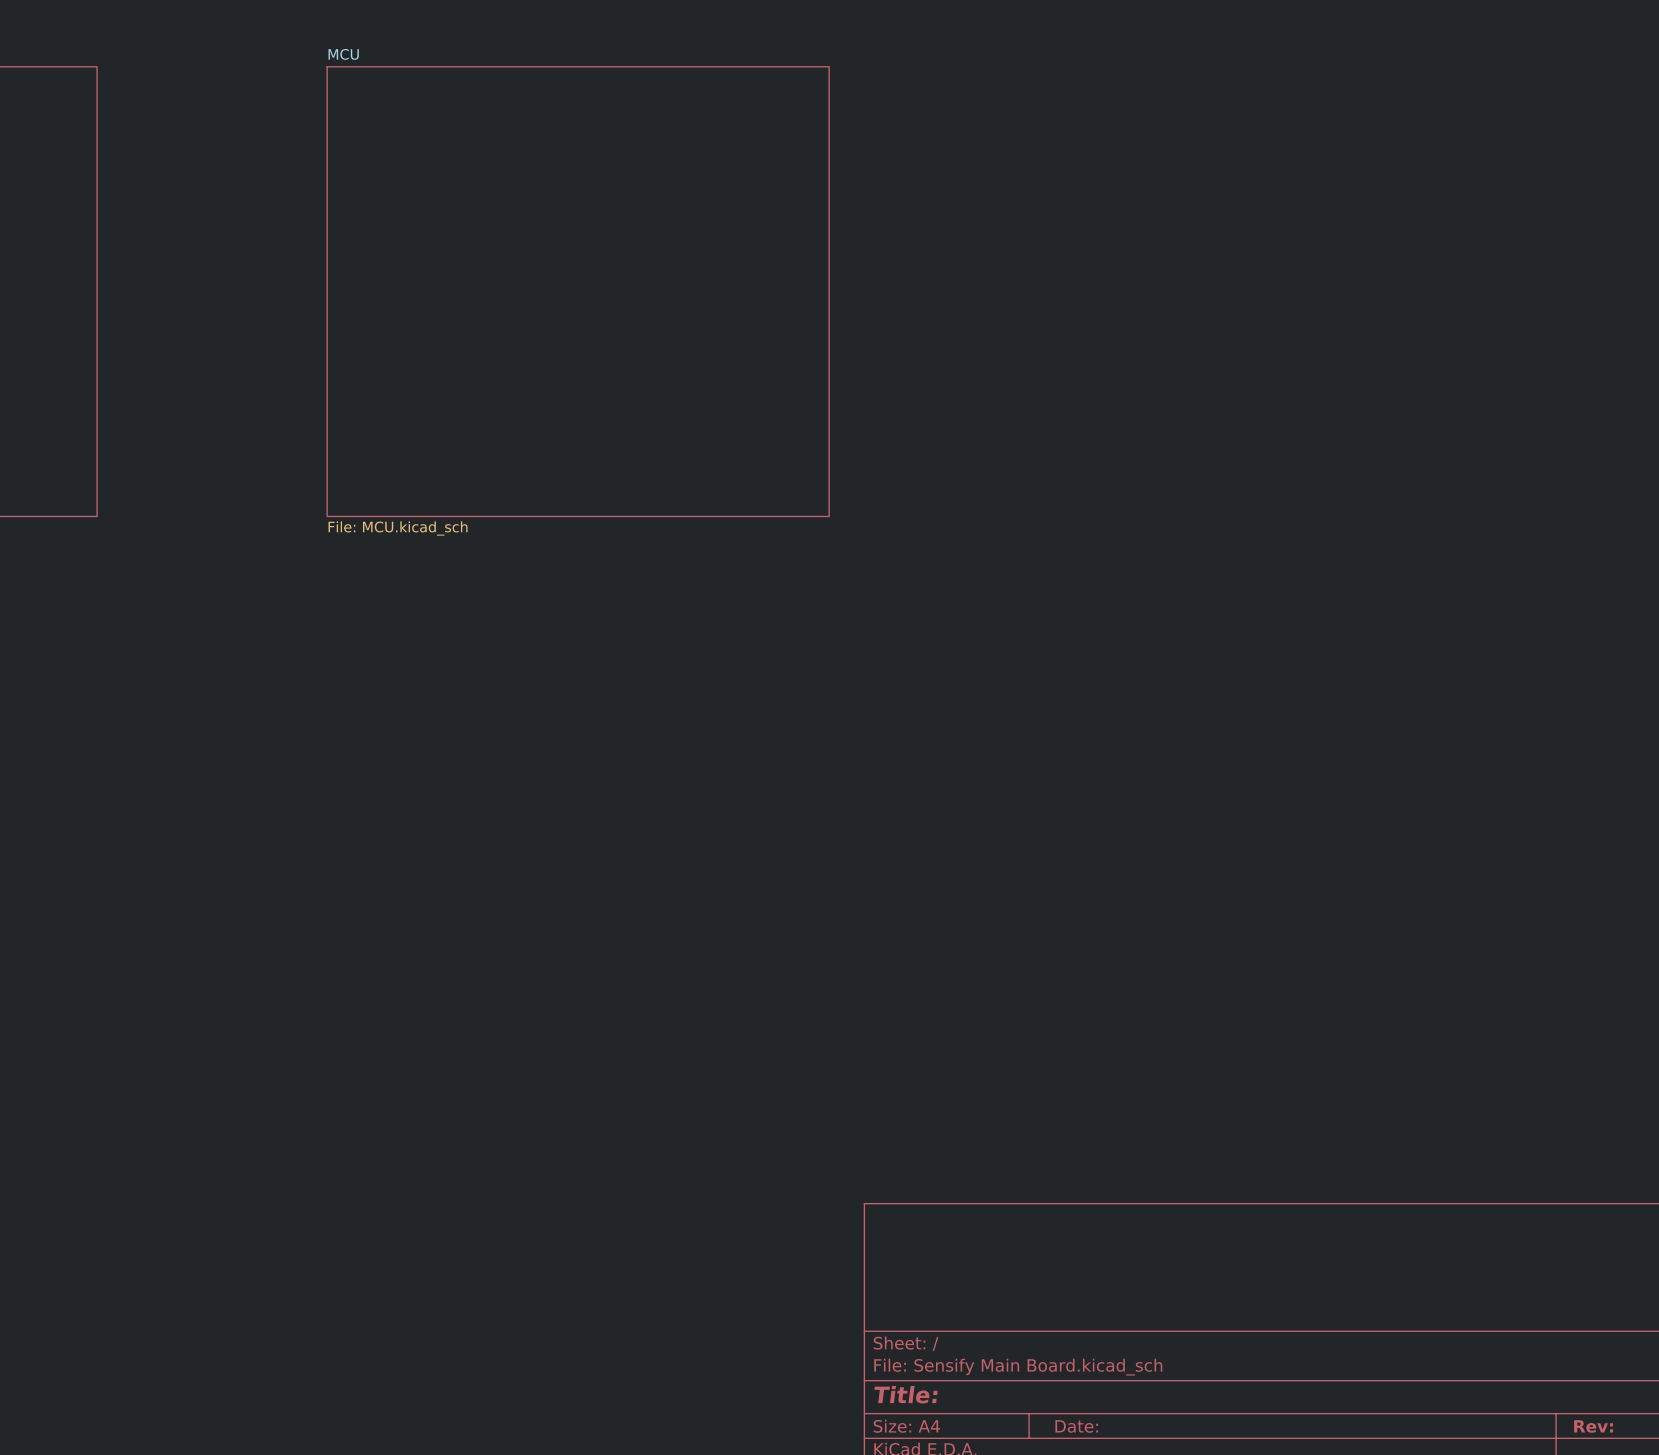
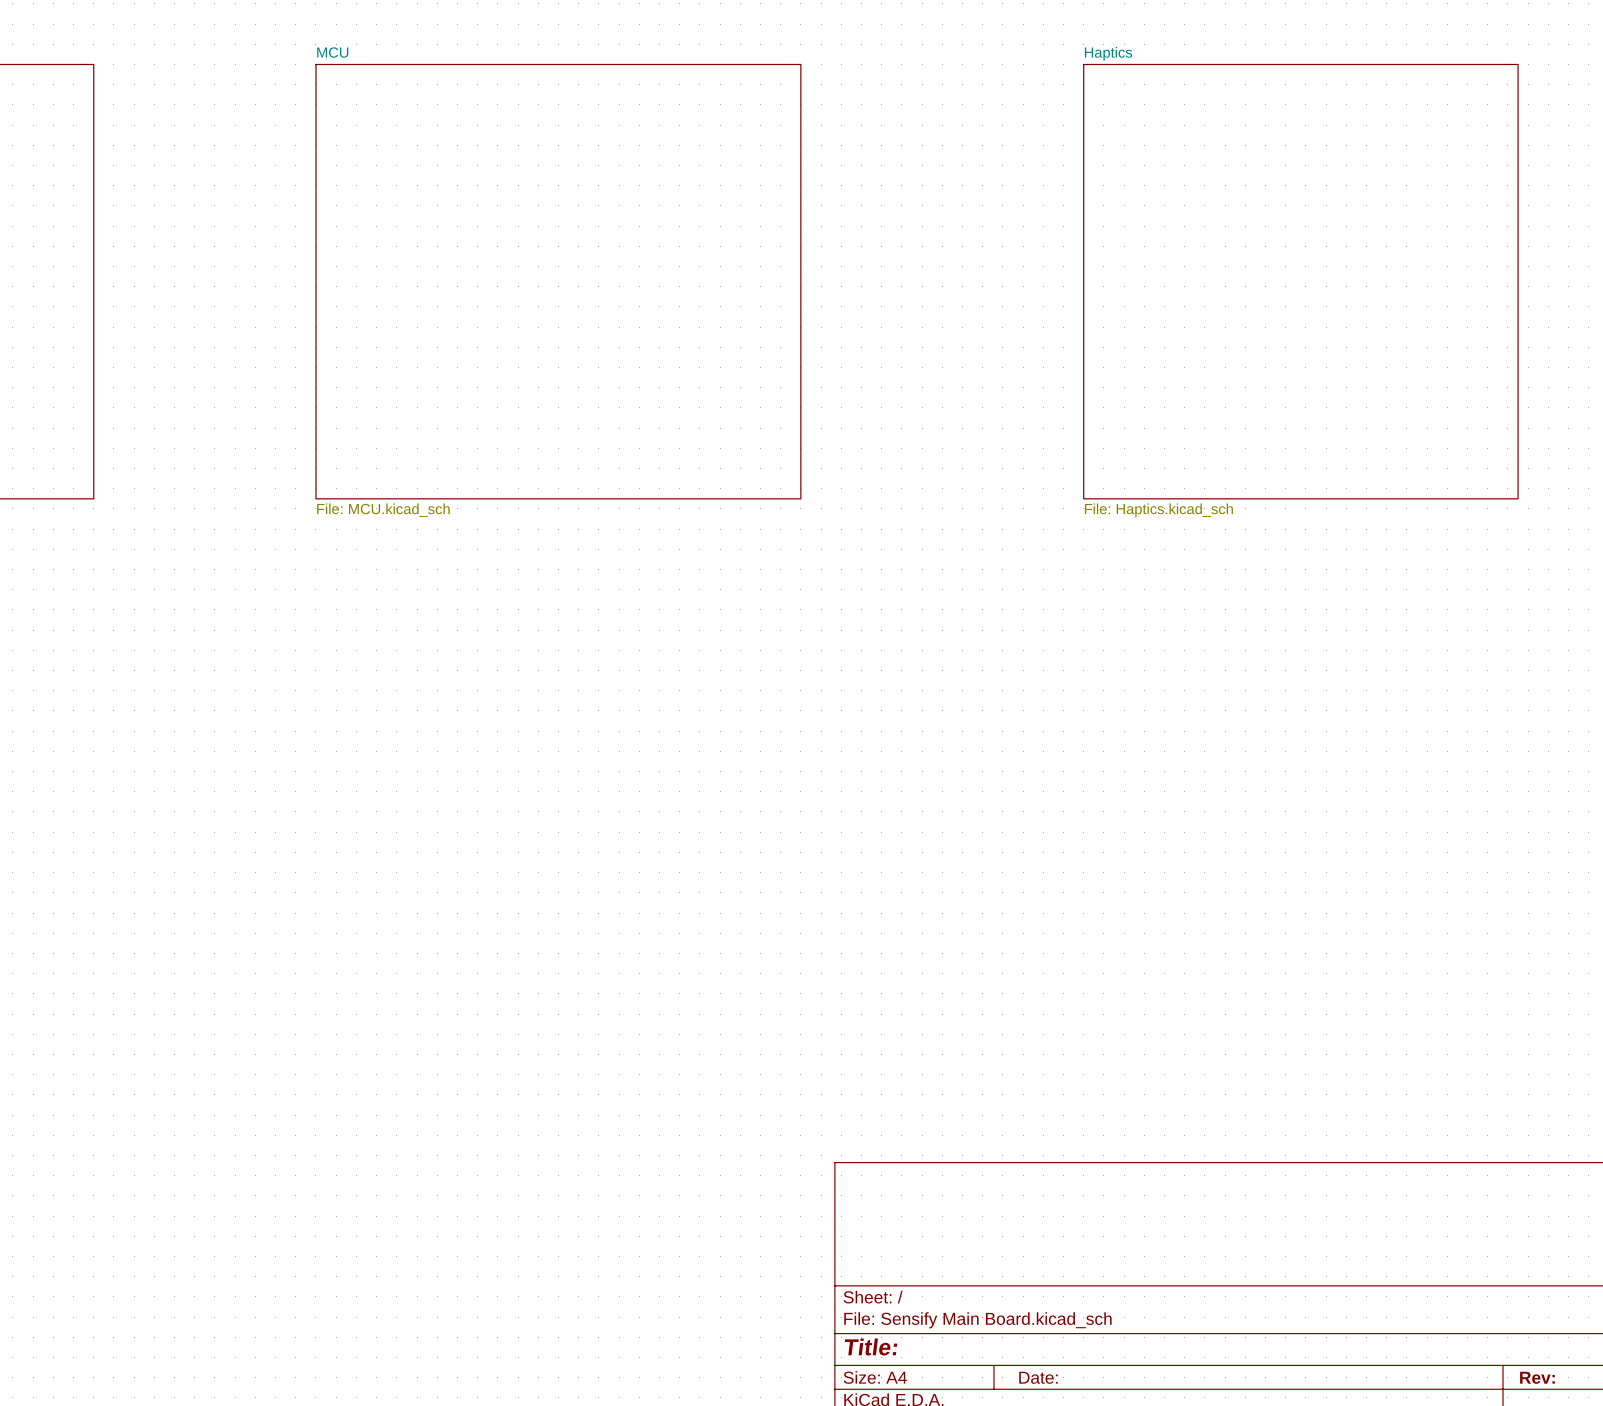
sheet Haptics: none -> File: Haptics.kicad_sch (1300, 281)

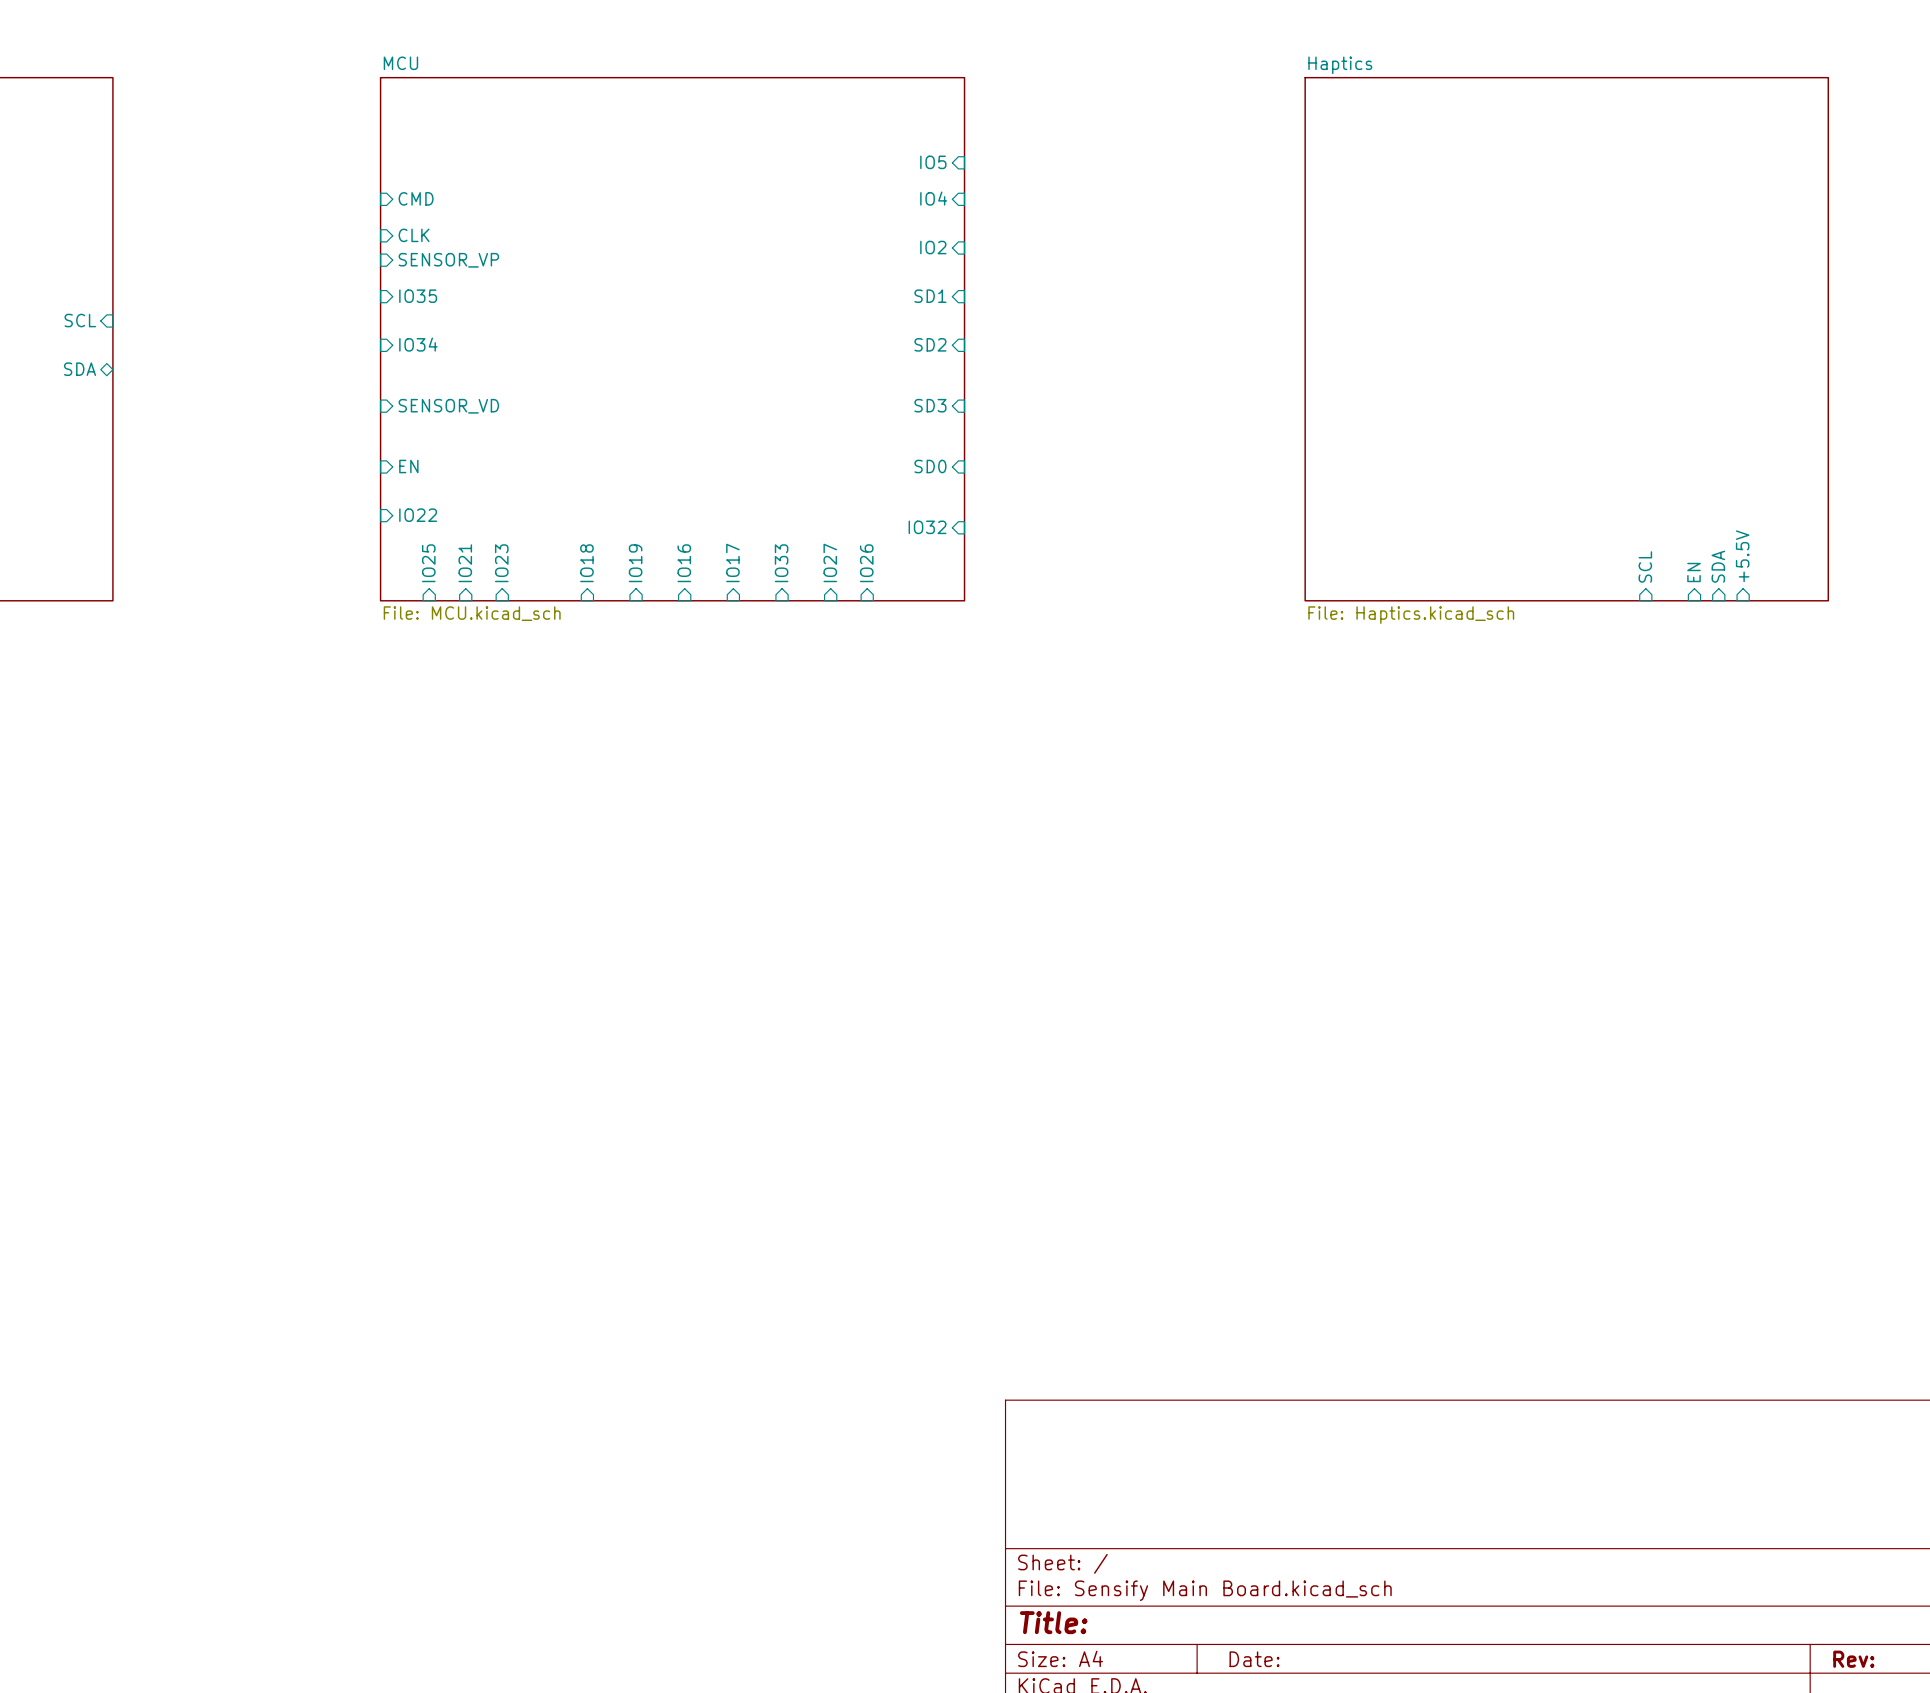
sheet pin: none -> IO5 (933, 162)
sheet pin: none -> CMD (416, 198)
sheet pin: none -> IO4 (933, 198)
sheet pin: none -> CLK (414, 235)
sheet pin: none -> IO2 (933, 247)
sheet pin: none -> SENSOR_VP (448, 260)
sheet pin: none -> IO35 (418, 296)
sheet pin: none -> SD1 (930, 296)
sheet pin: none -> SCL (80, 320)
sheet pin: none -> IO34 (418, 344)
sheet pin: none -> SD2 (930, 344)
sheet pin: none -> SDA (80, 369)
sheet pin: none -> SD3 (930, 405)
sheet pin: none -> SENSOR_VD (448, 406)
sheet pin: none -> EN (408, 466)
sheet pin: none -> SD0 (930, 466)
sheet pin: none -> IO22 (418, 515)
sheet pin: none -> IO32 (927, 527)
sheet pin: none -> +5.5V (1742, 556)
sheet pin: none -> IO25 (428, 563)
sheet pin: none -> IO21 (465, 563)
sheet pin: none -> IO23 (501, 563)
sheet pin: none -> IO18 (586, 563)
sheet pin: none -> IO19 (635, 563)
sheet pin: none -> IO16 (684, 563)
sheet pin: none -> IO17 (732, 562)
sheet pin: none -> IO33 (781, 563)
sheet pin: none -> IO27 (830, 562)
sheet pin: none -> IO26 (866, 563)
sheet pin: none -> SDA (1718, 566)
sheet pin: none -> SCL (1645, 566)
sheet pin: none -> EN (1694, 572)

